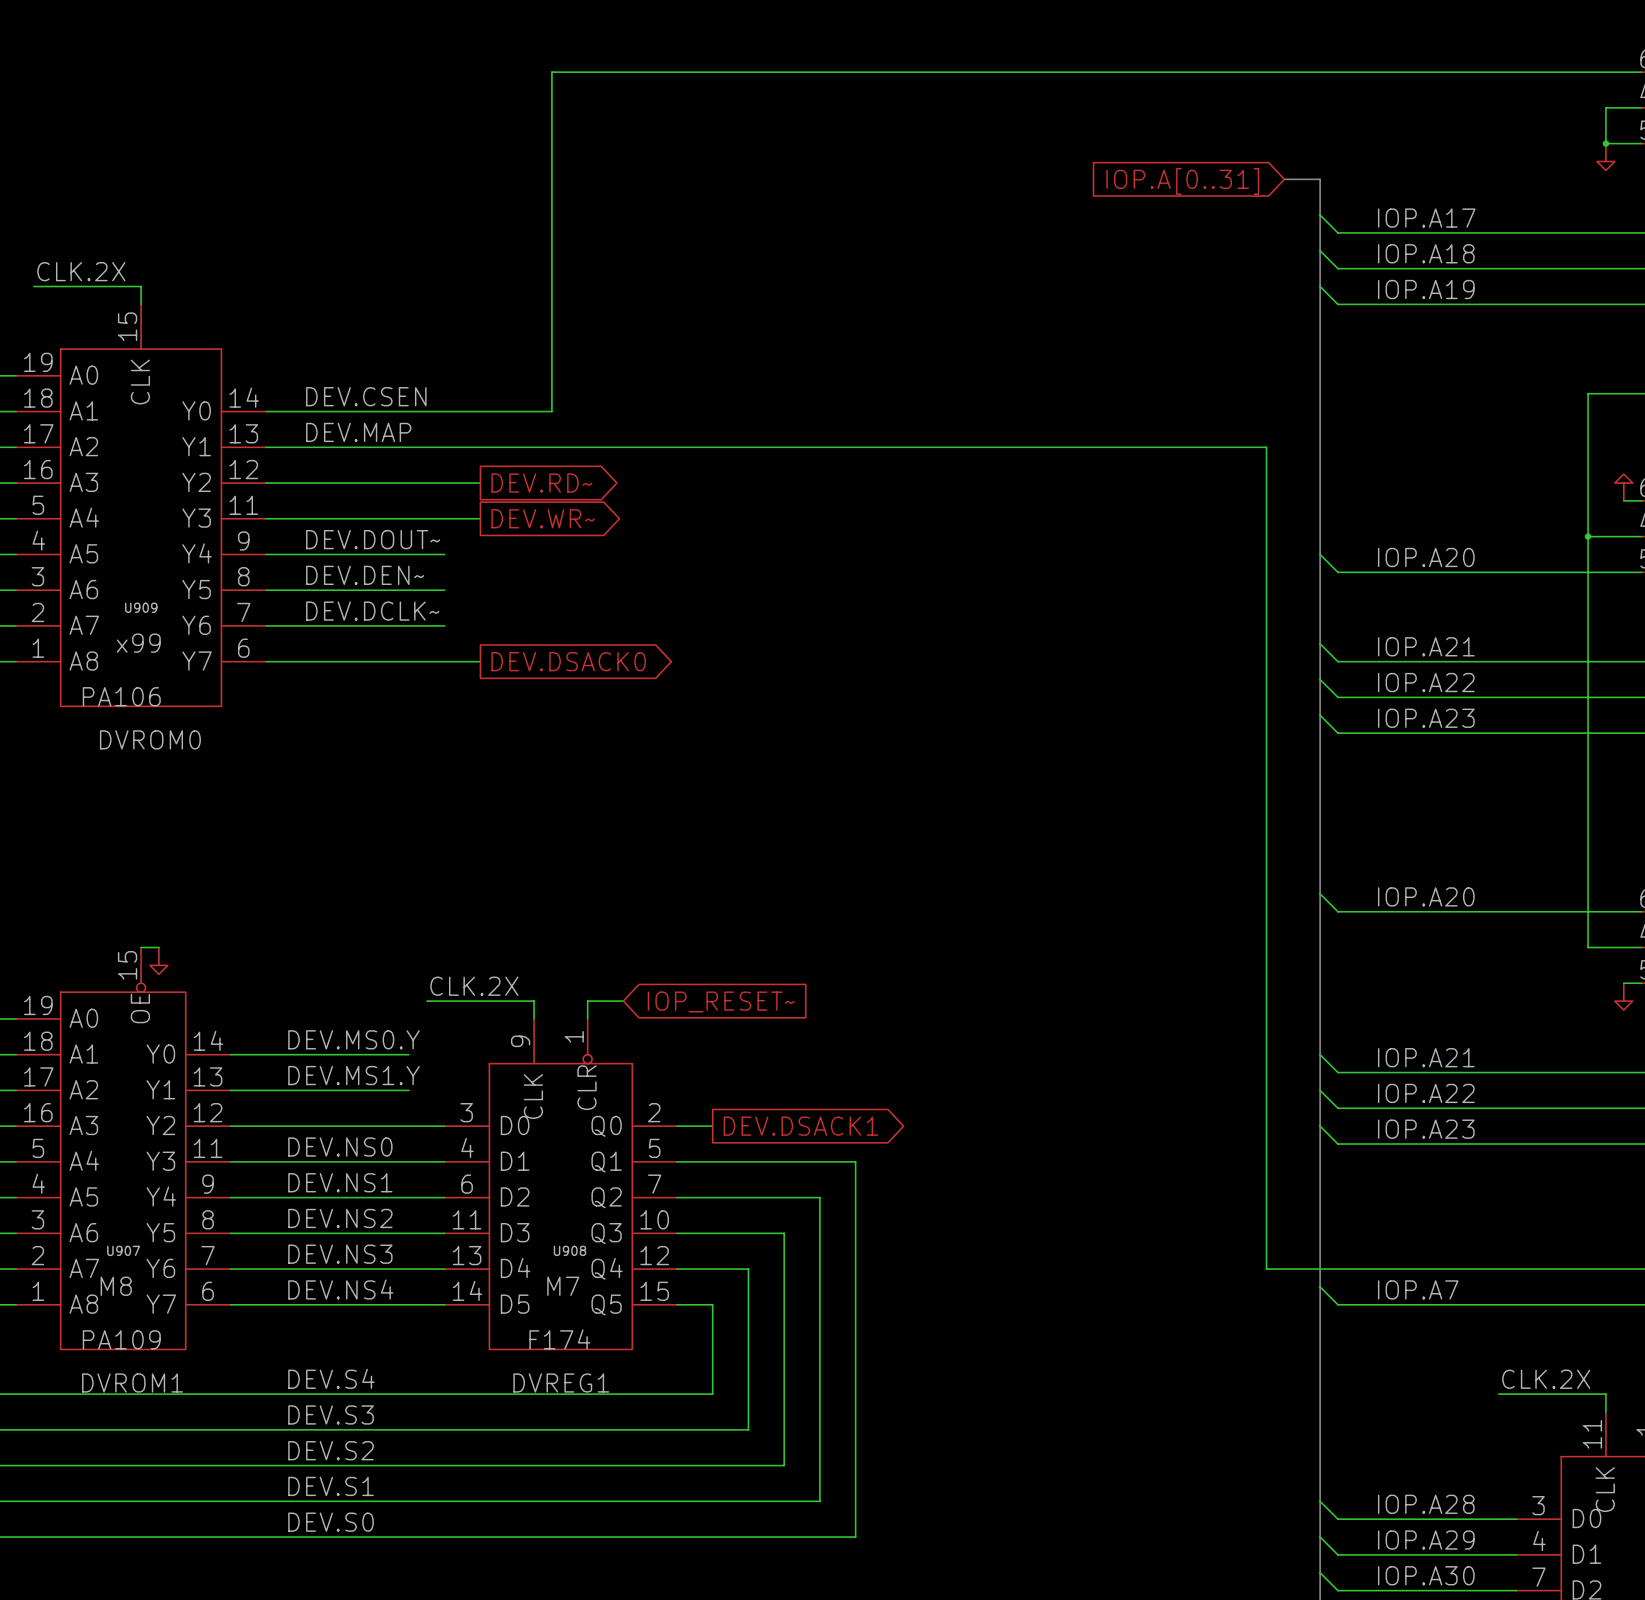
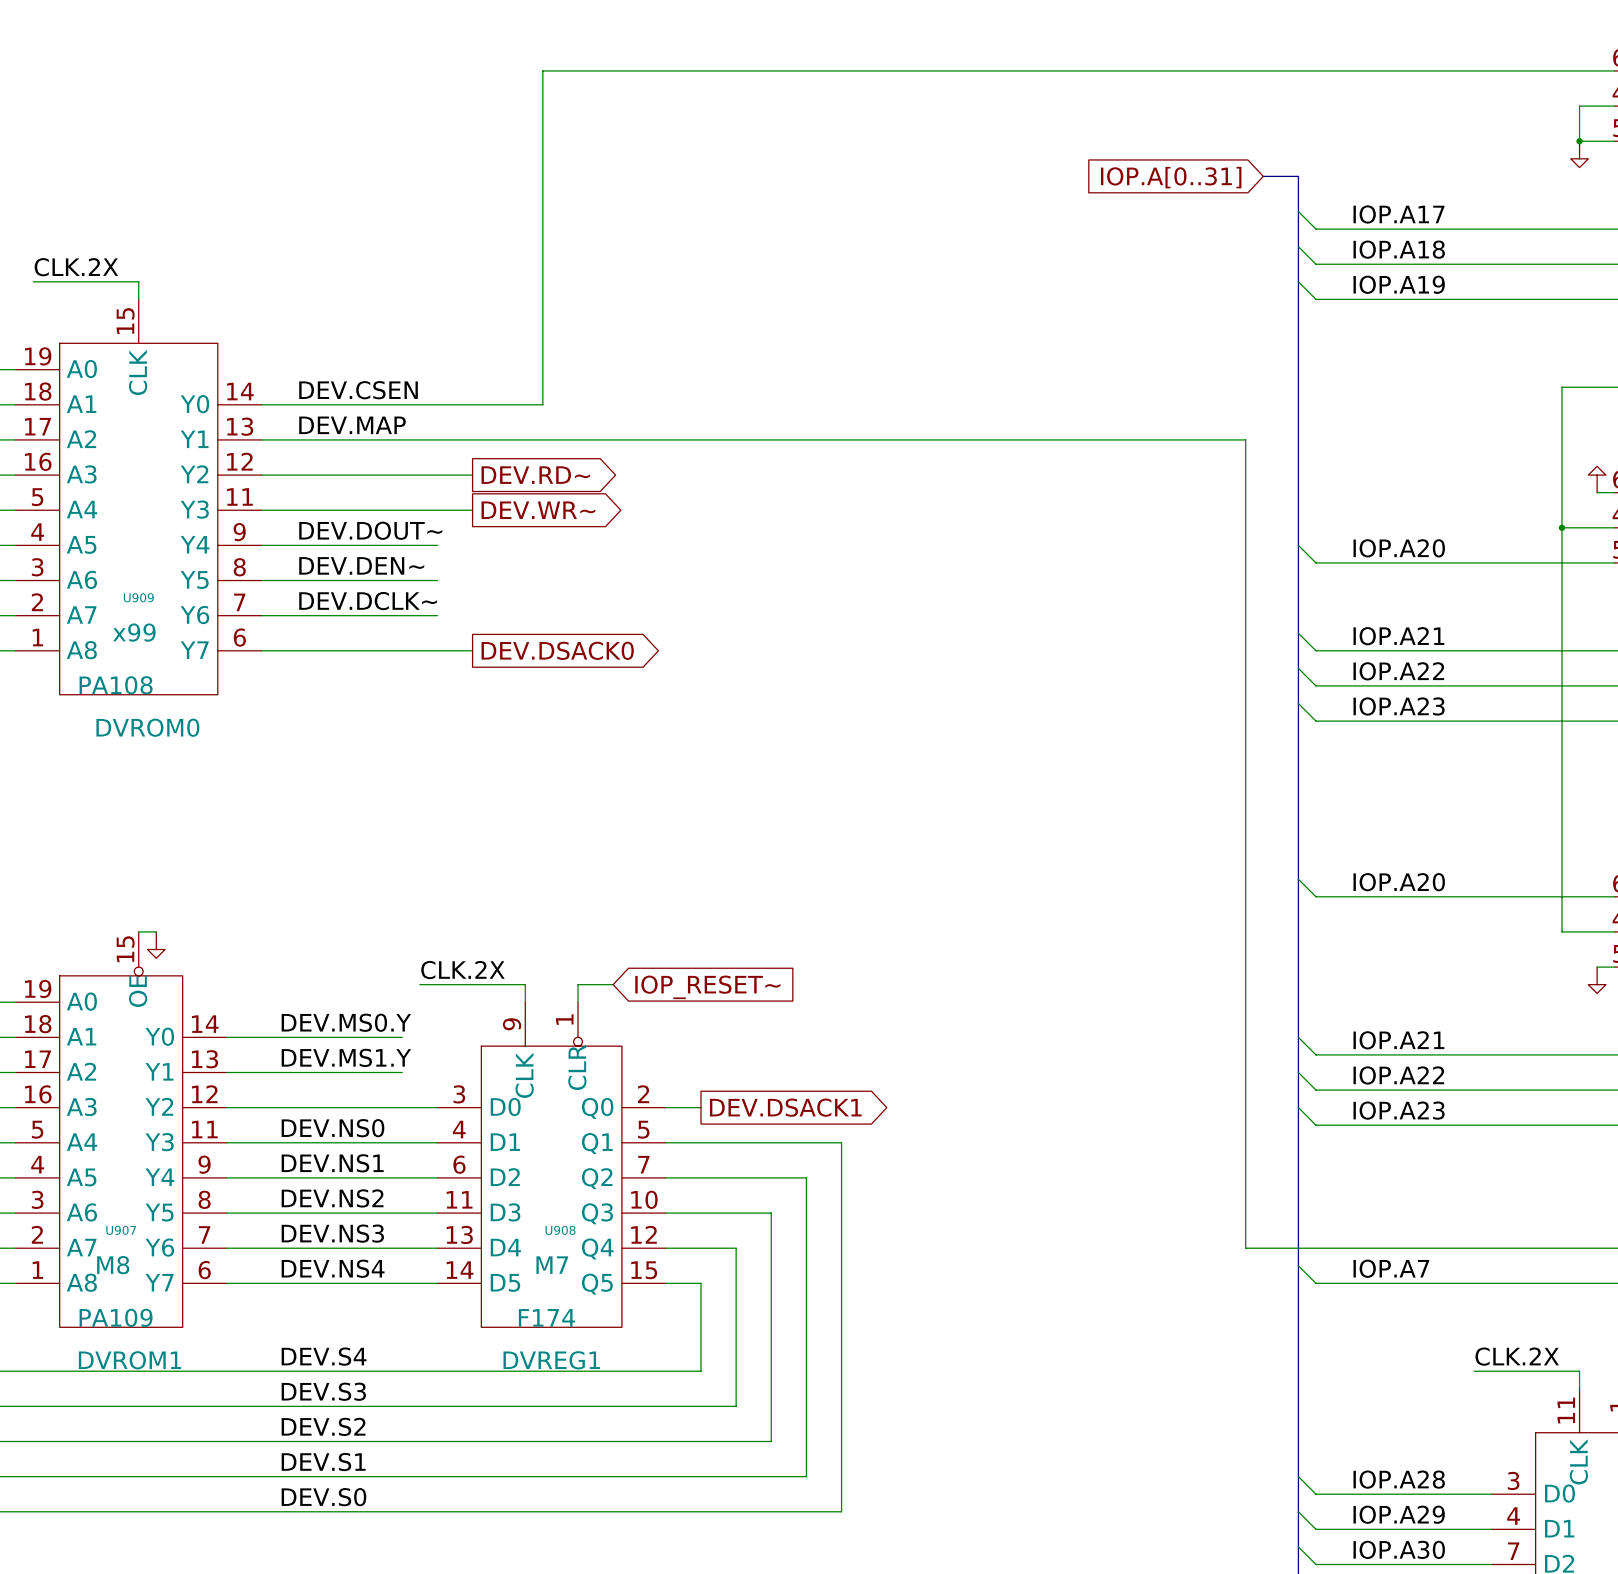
U909 value: PA106 (121, 696) -> PA108 (116, 685)

